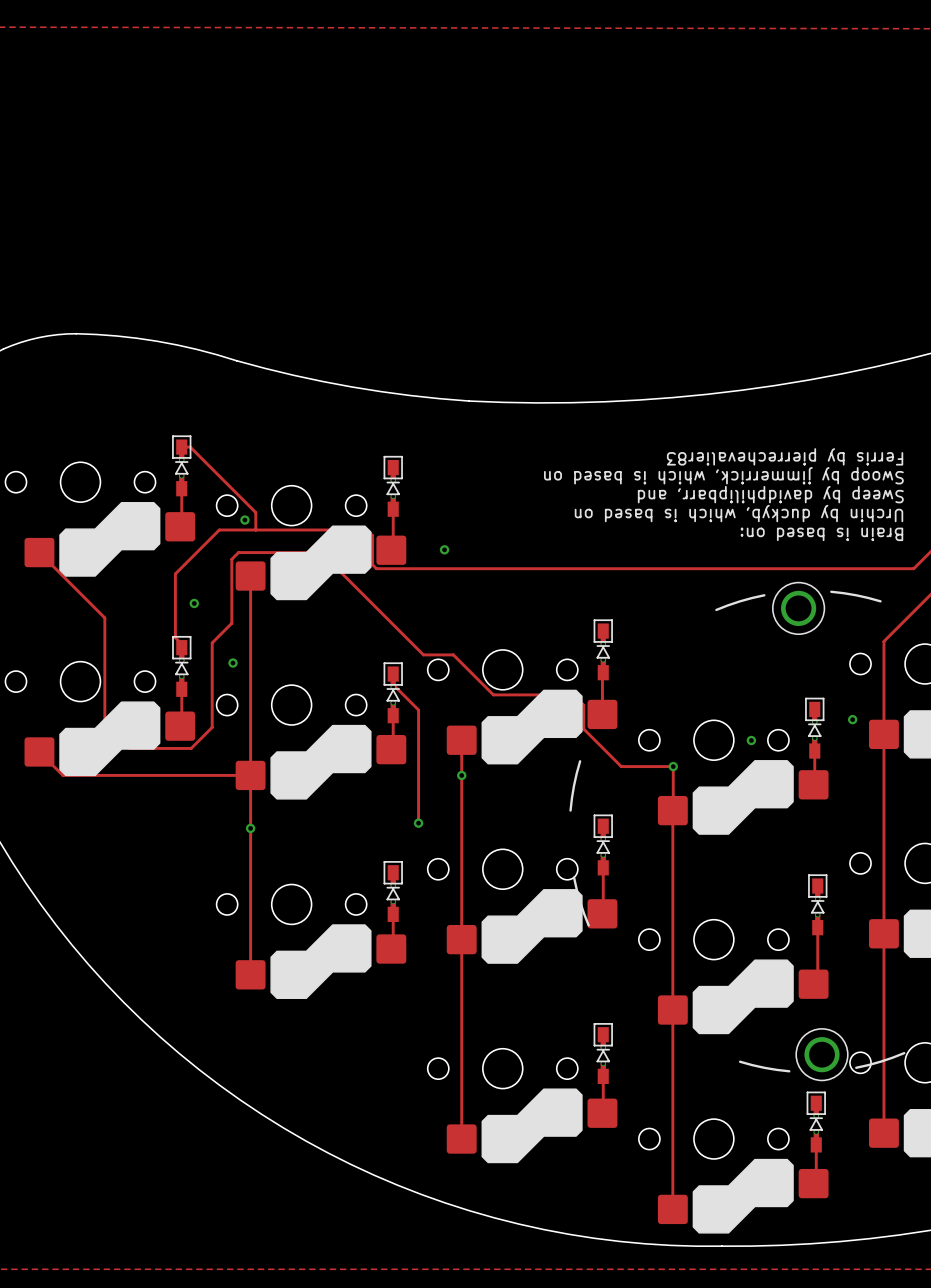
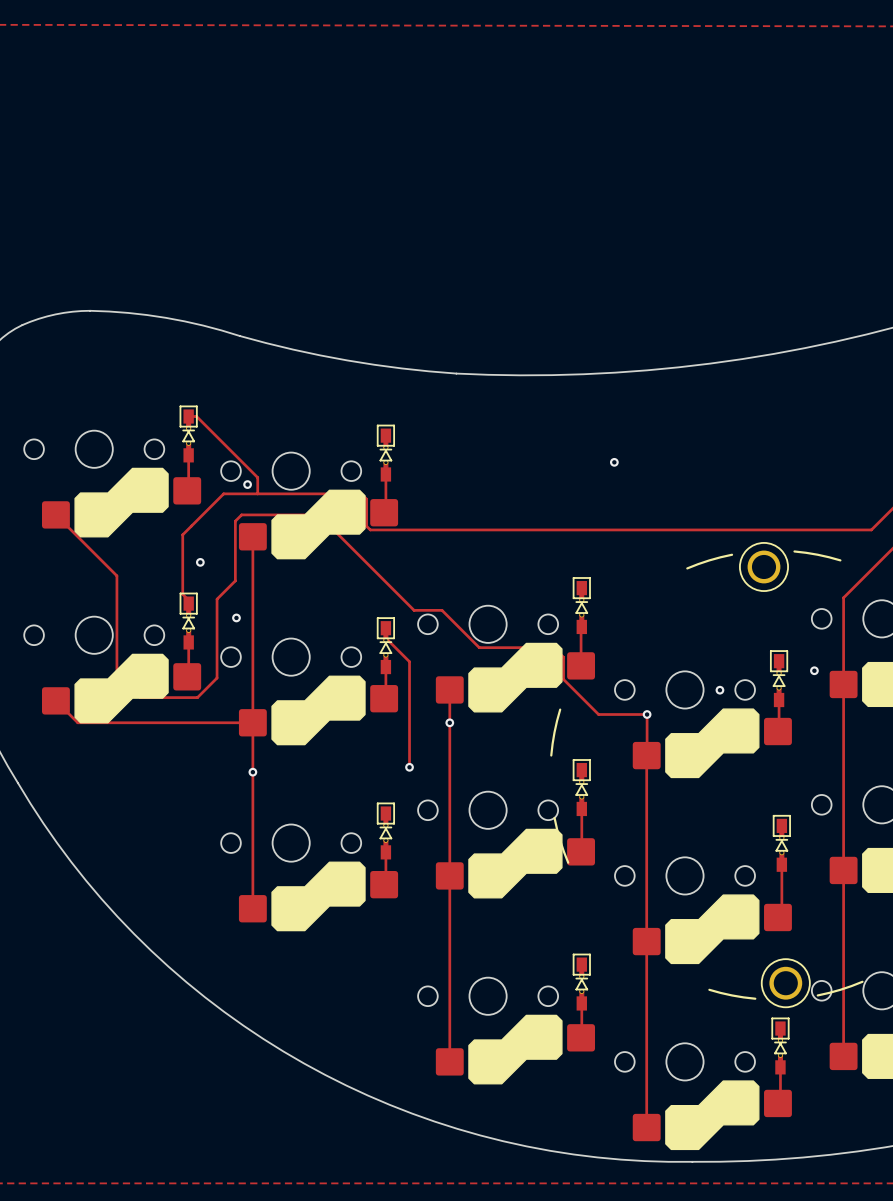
text: Ferris by pierrechevalier83 (785, 456) -> none
text: Swoop by jimmerrick, which is based on (723, 475) -> none
text: Sweep by davidphilipbarr, and (770, 494) -> none
via: none -> (614, 462)
text: Urchin by duckyb, which is based on (738, 513) -> none
text: Brain is based on: (821, 534) -> none
via: (444, 549) -> none

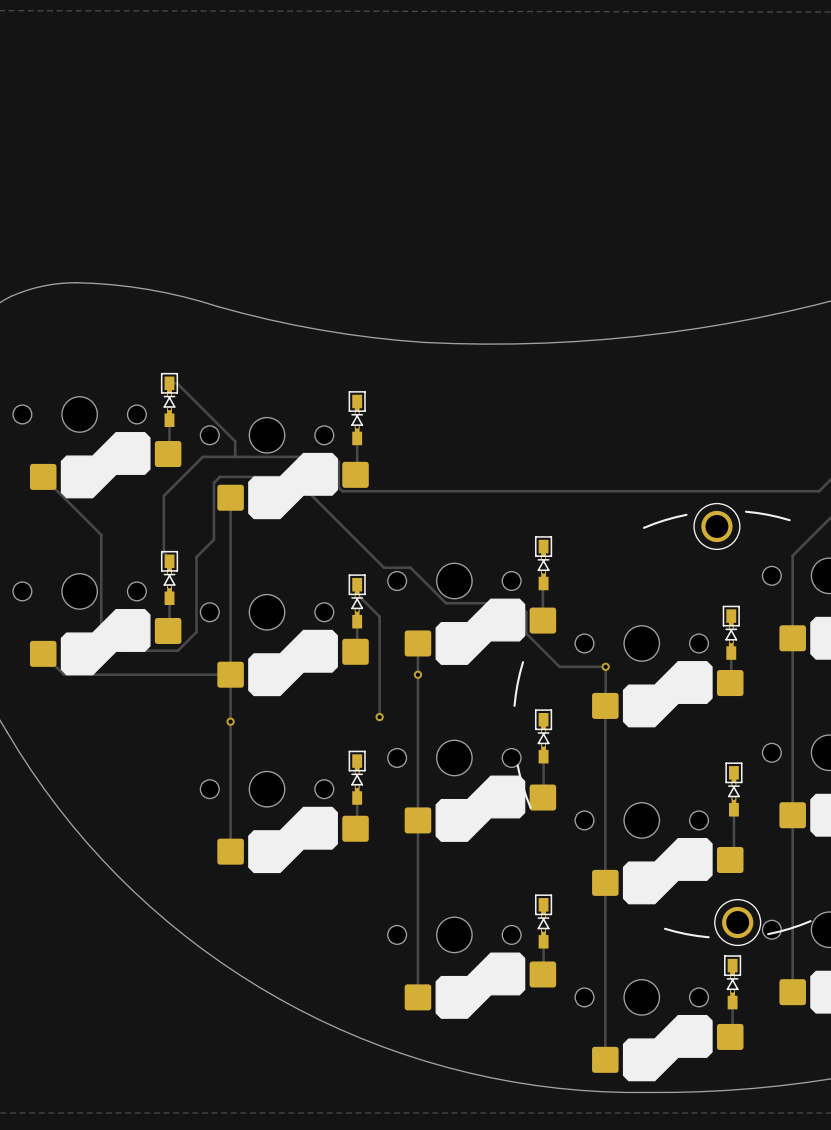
via: (614, 462) -> none
via: (247, 484) -> none
via: (200, 562) -> none
via: (236, 617) -> none
via: (814, 670) -> none
via: (719, 690) -> none

